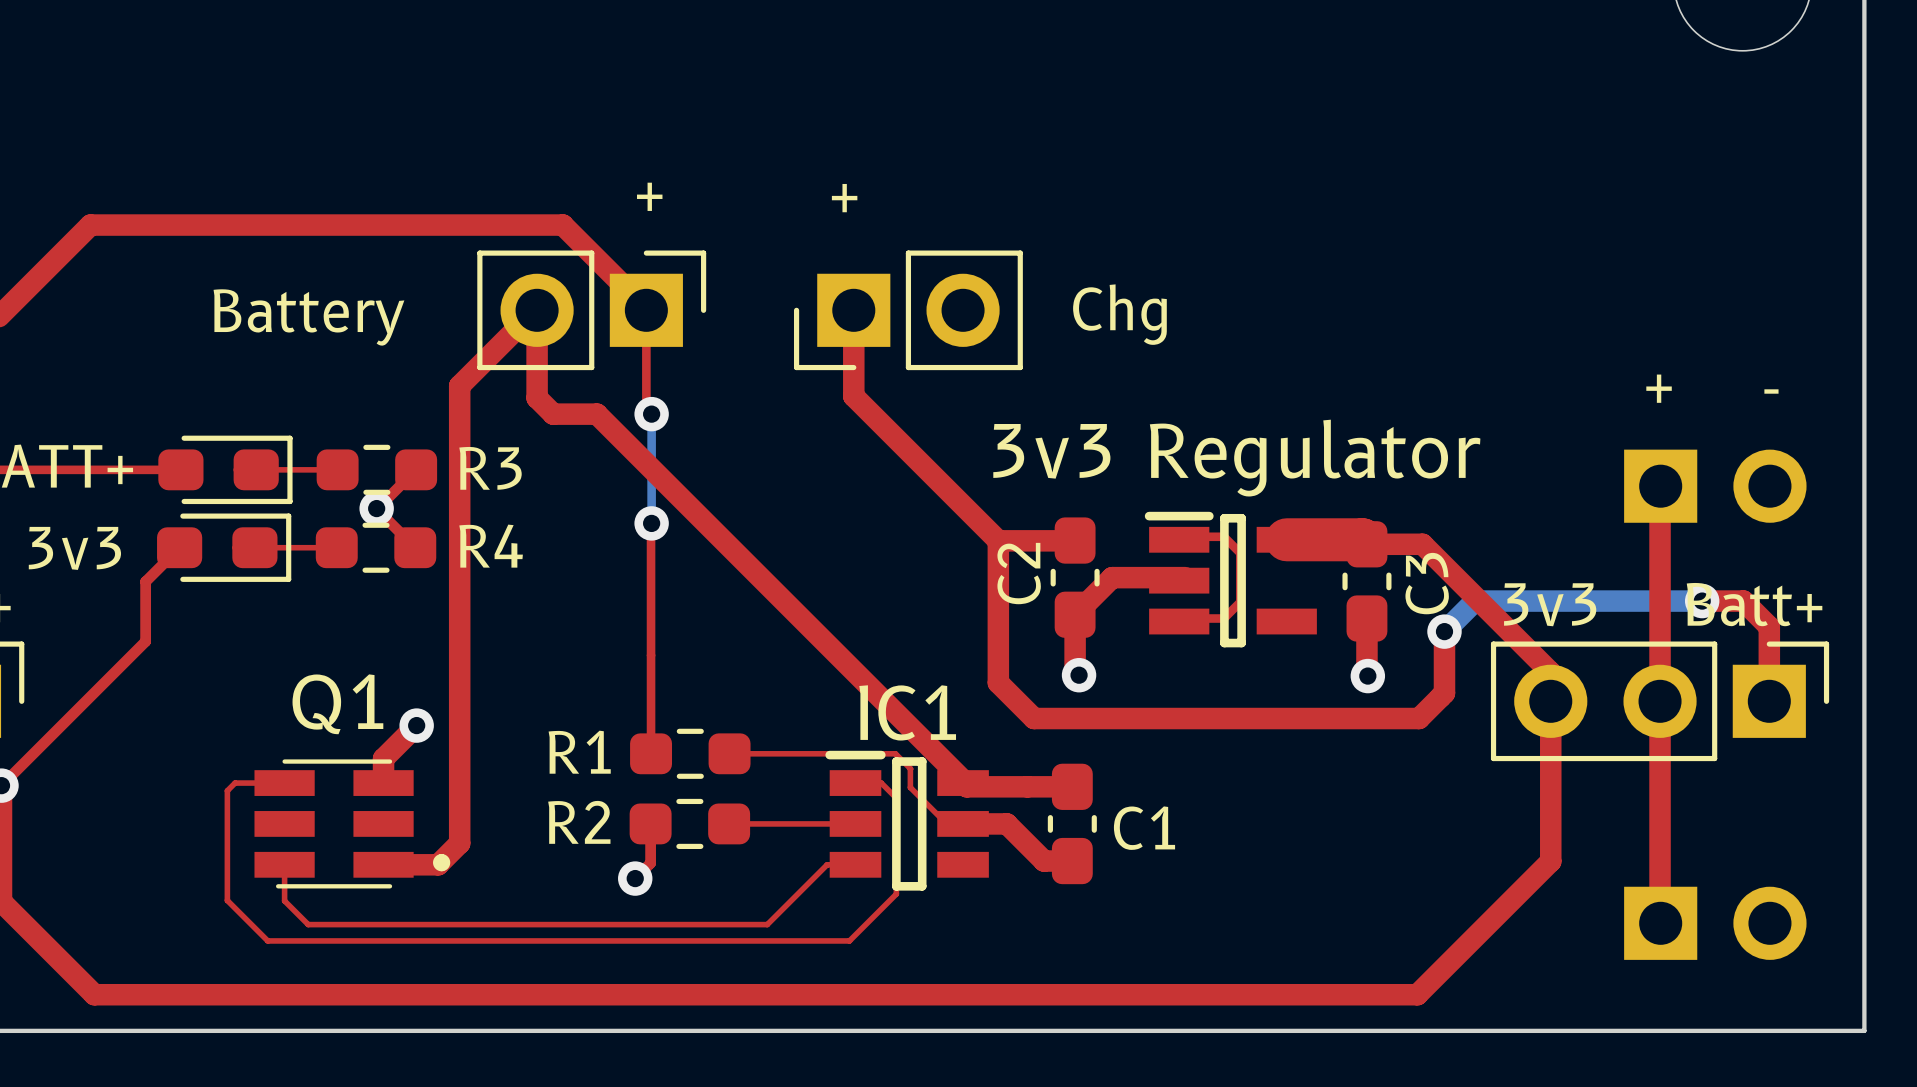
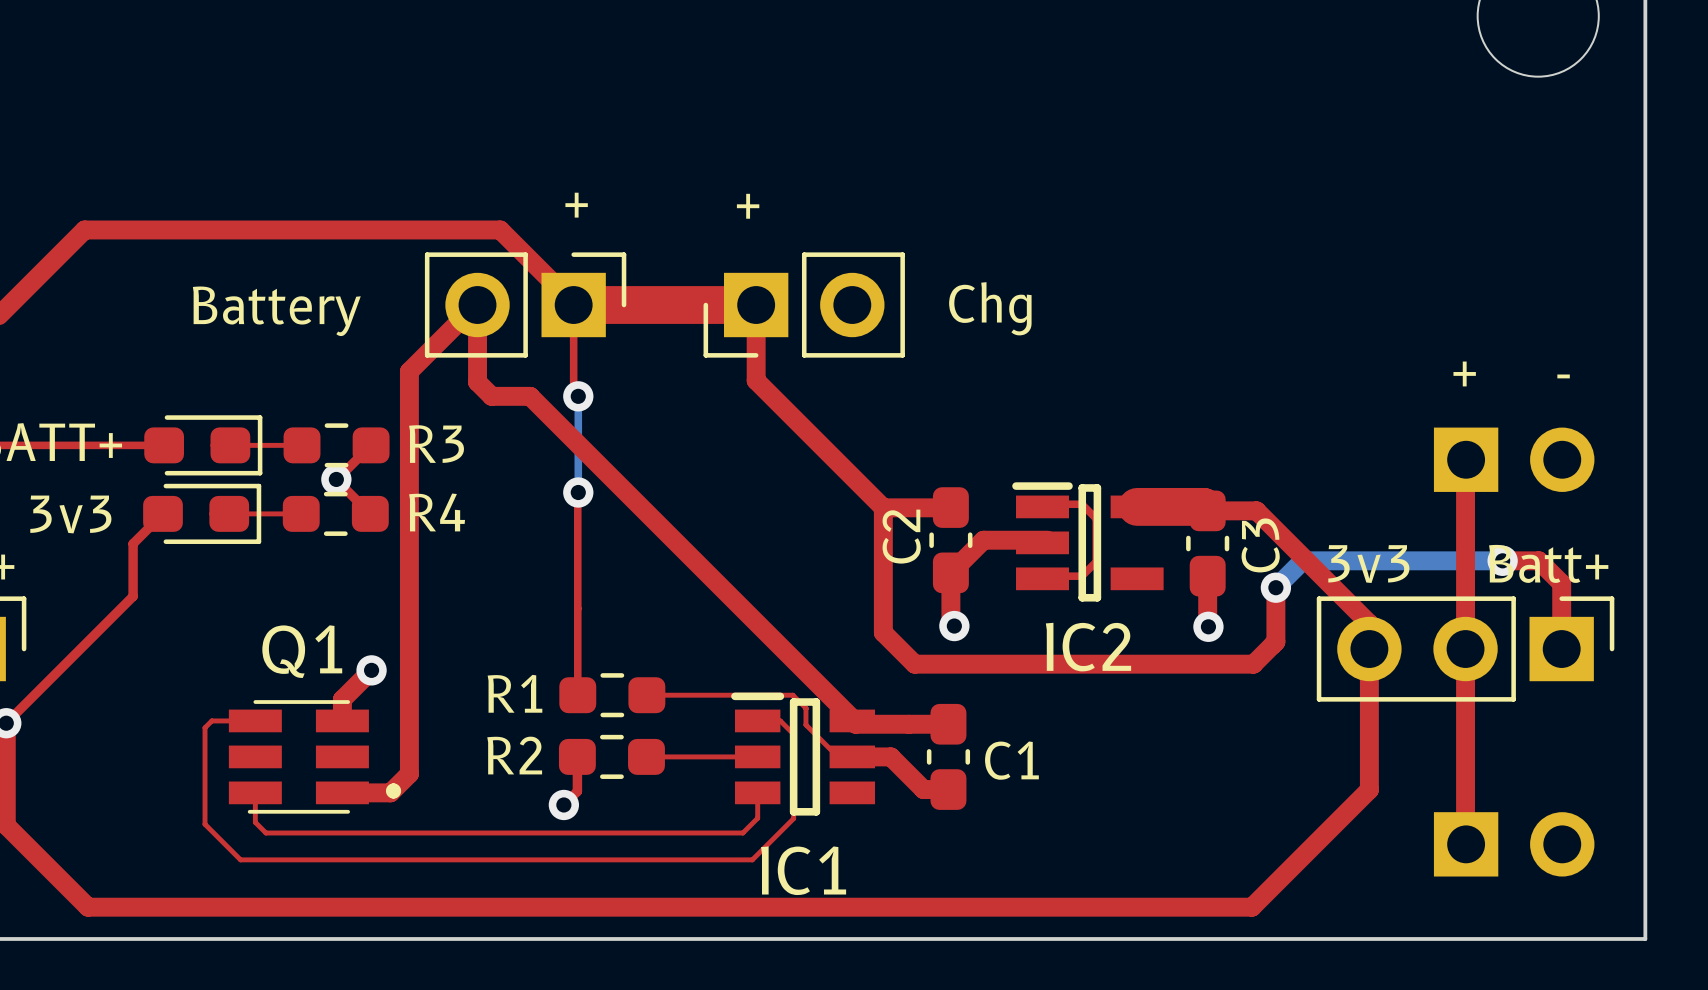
top track: none -> (573, 303) (575, 305) (756, 305)
IC2 value: 3v3 Regulator (1236, 458) -> none
IC2 name: none -> IC2 (1088, 647)
IC1 name position: IC1 (907, 712) -> IC1 (803, 870)
top track: (855, 864) (827, 864) (767, 924) (308, 924) (284, 900) (284, 898) -> (757, 792) (757, 818) (742, 832) (265, 832) (255, 822)

